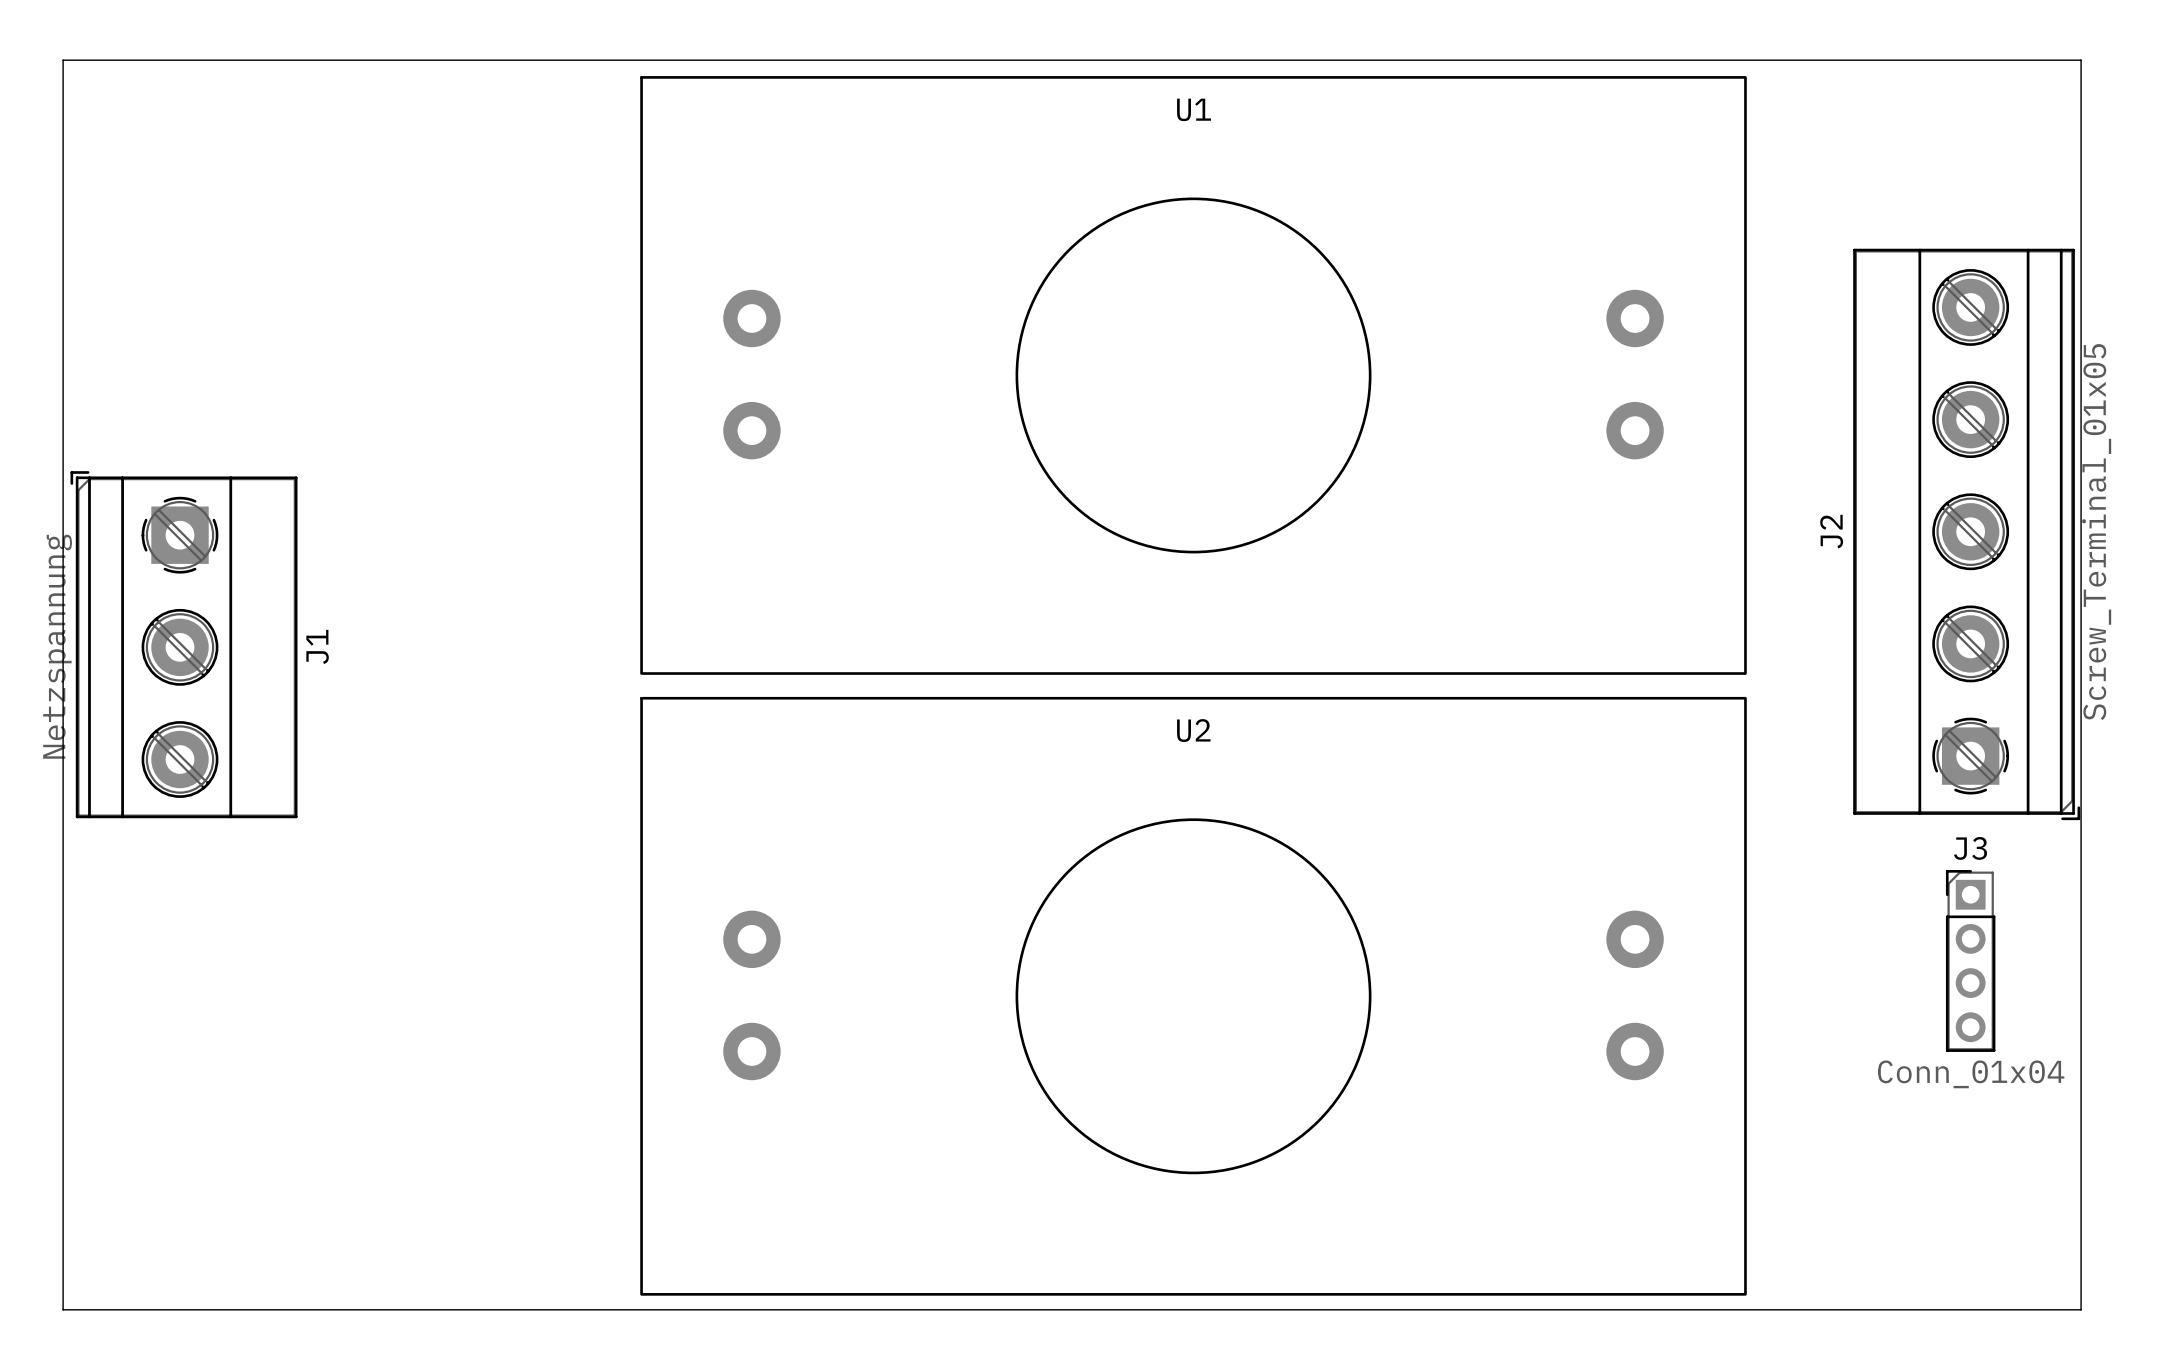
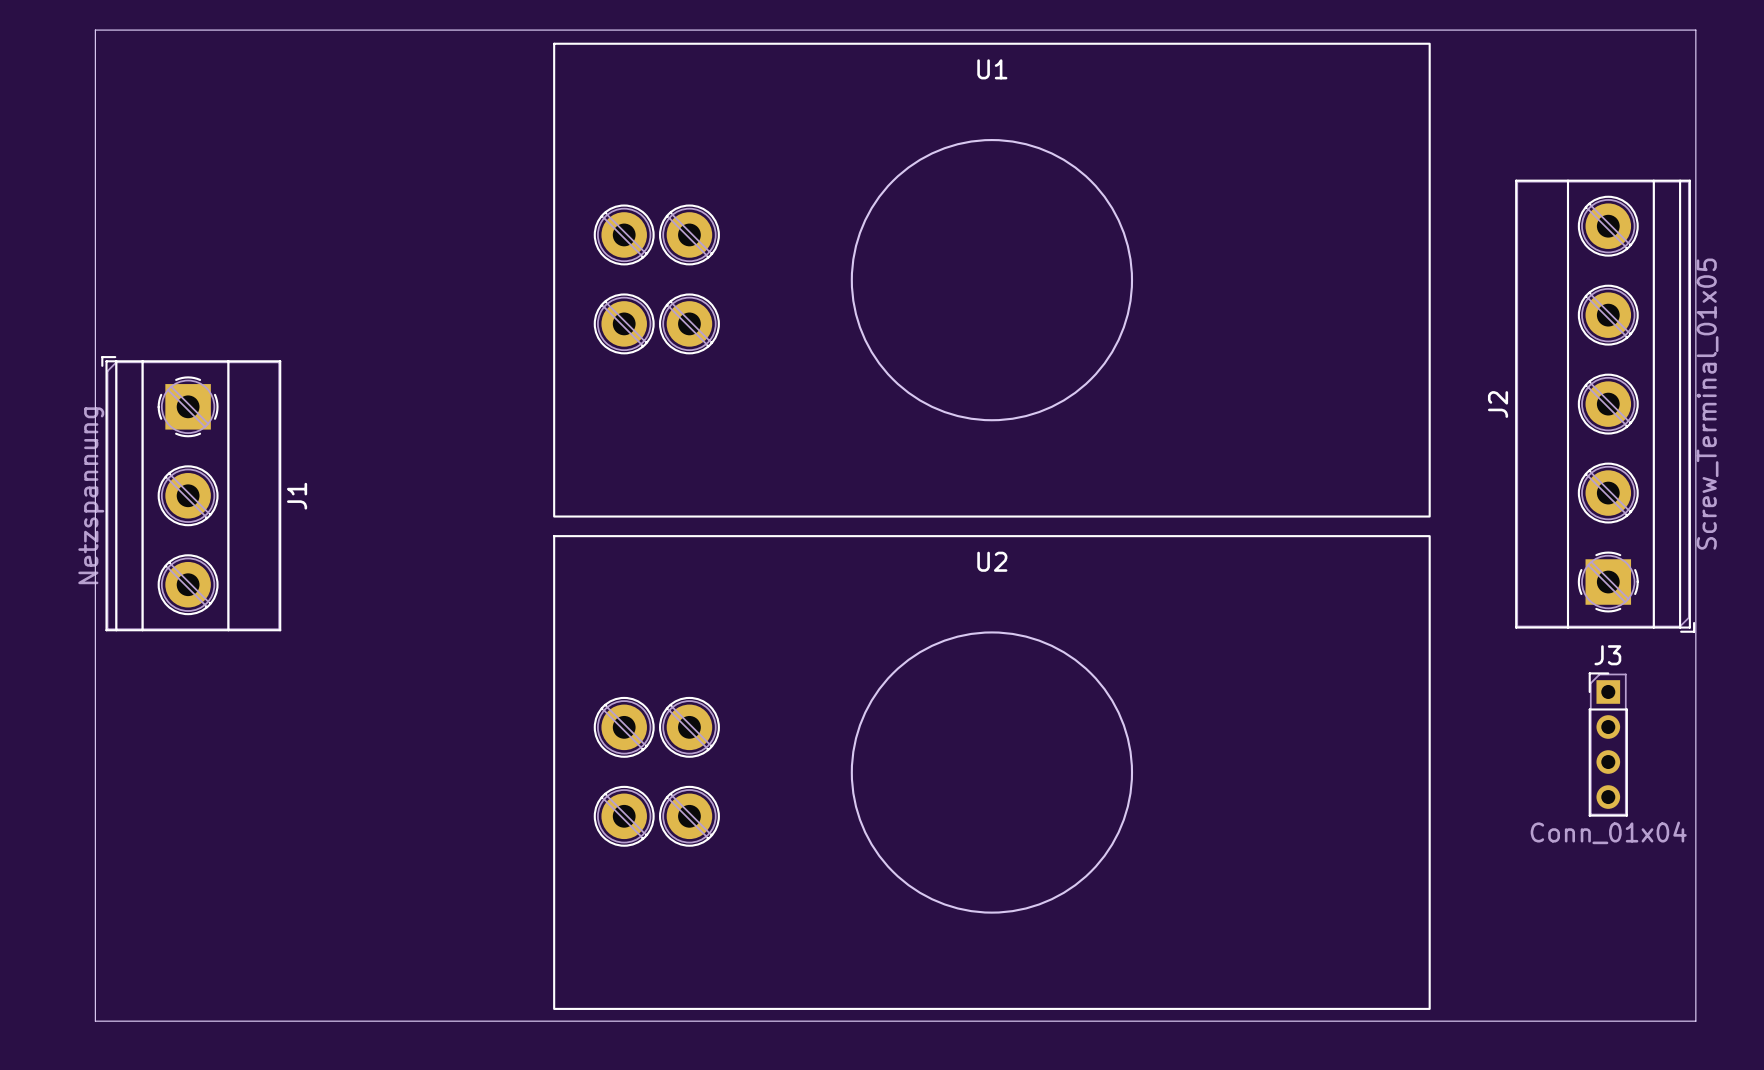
U1 footprint: [640, 76, 1747, 675] -> [553, 42, 1431, 518]
U2 footprint: [640, 696, 1747, 1296] -> [553, 535, 1431, 1010]

